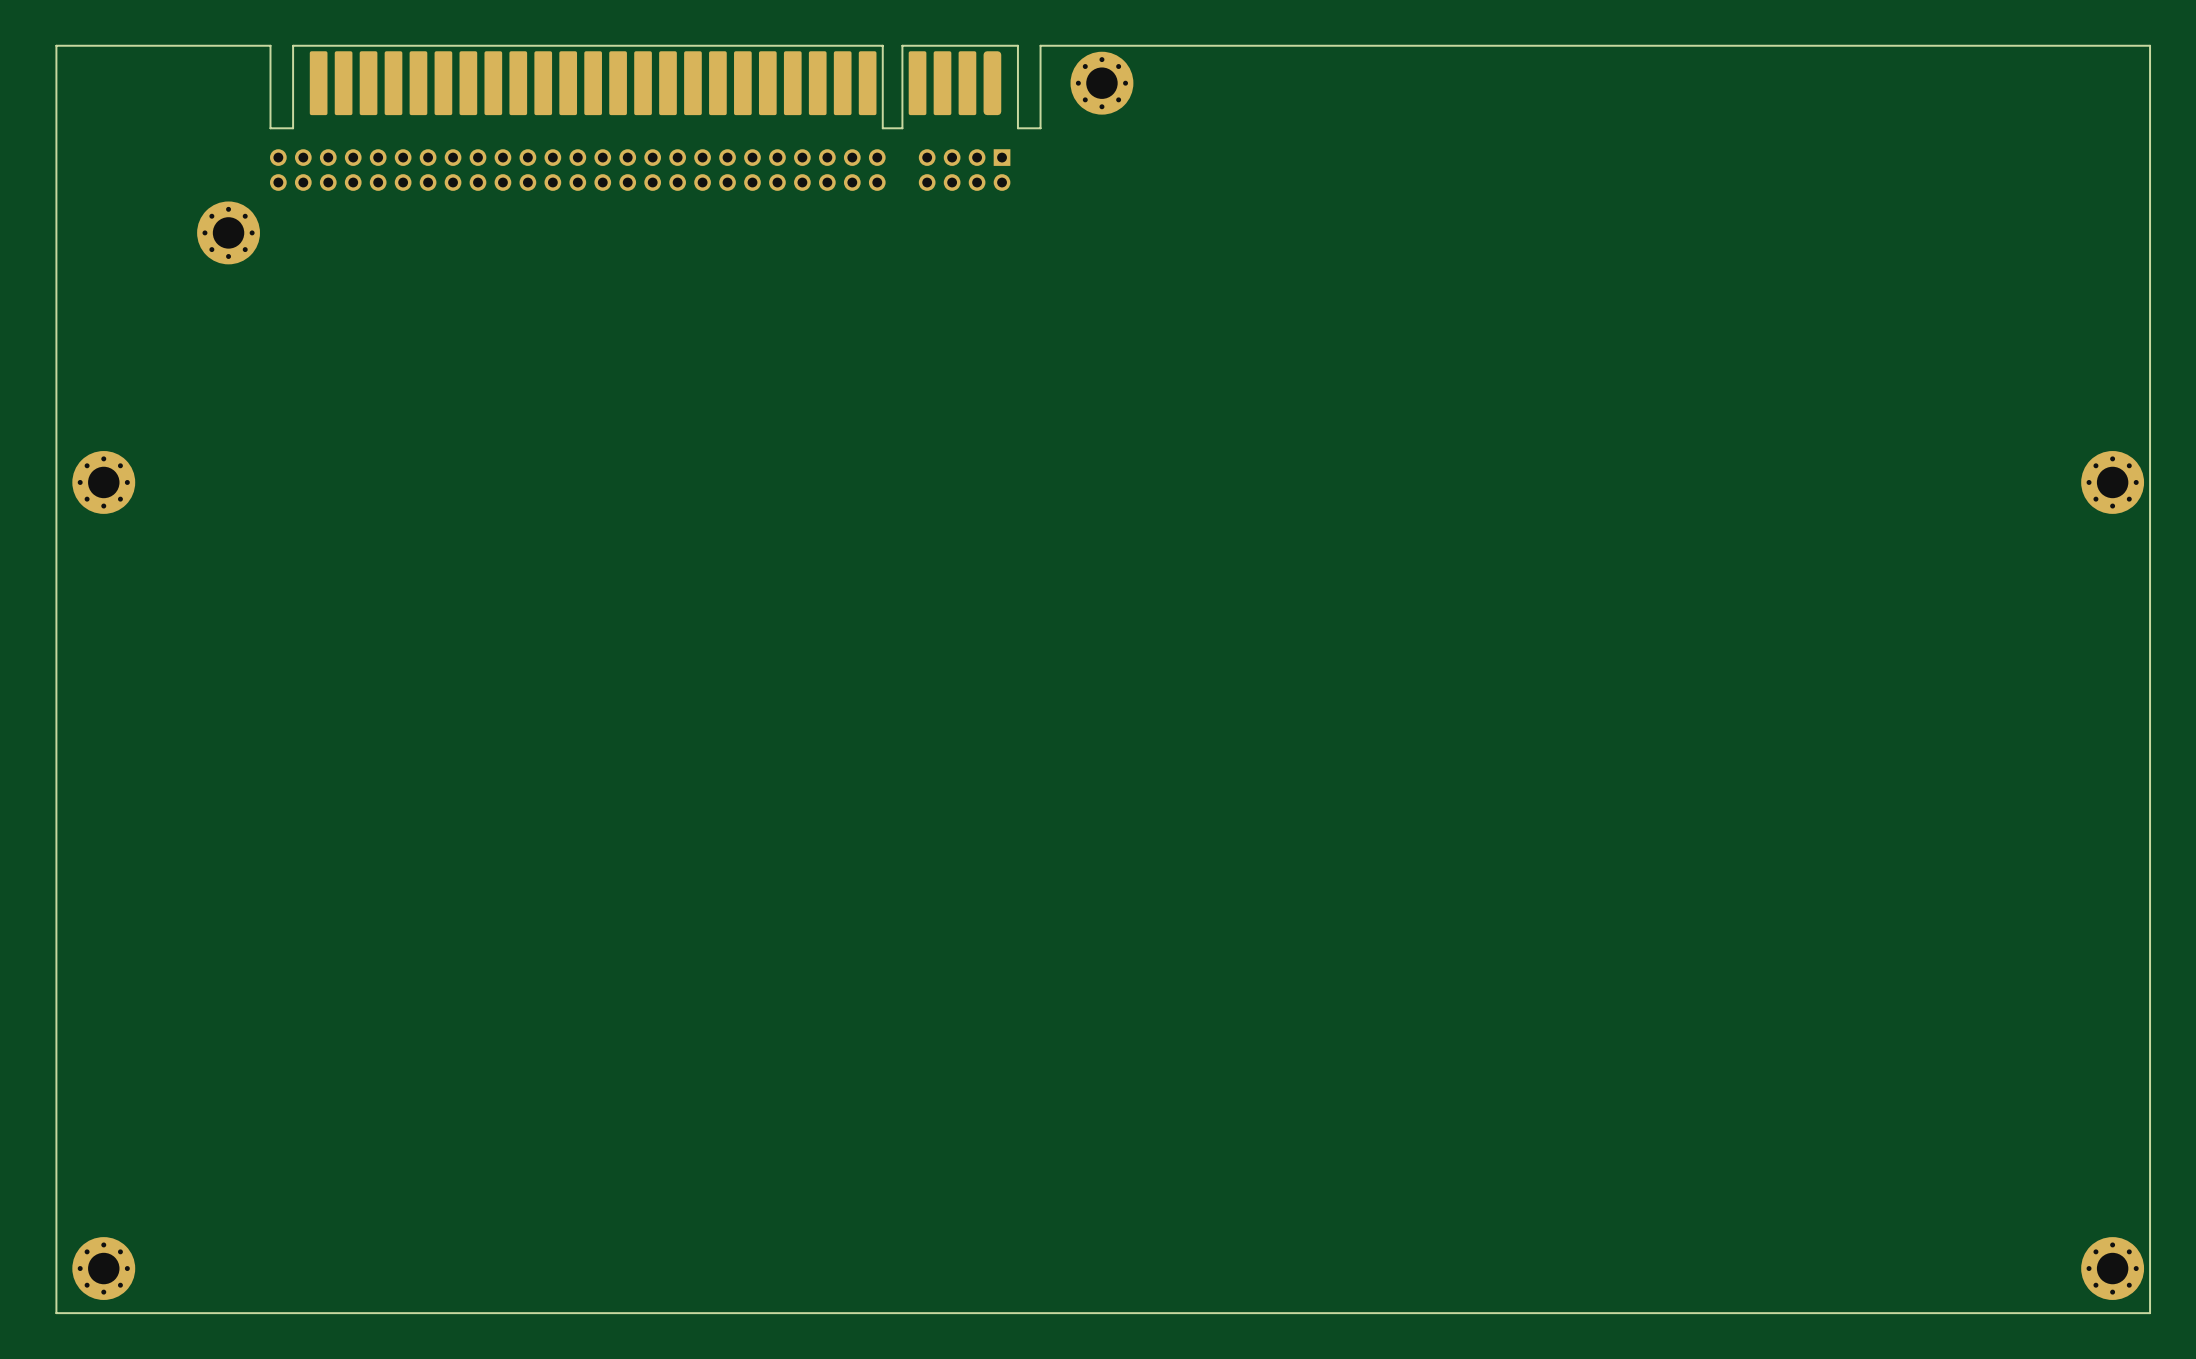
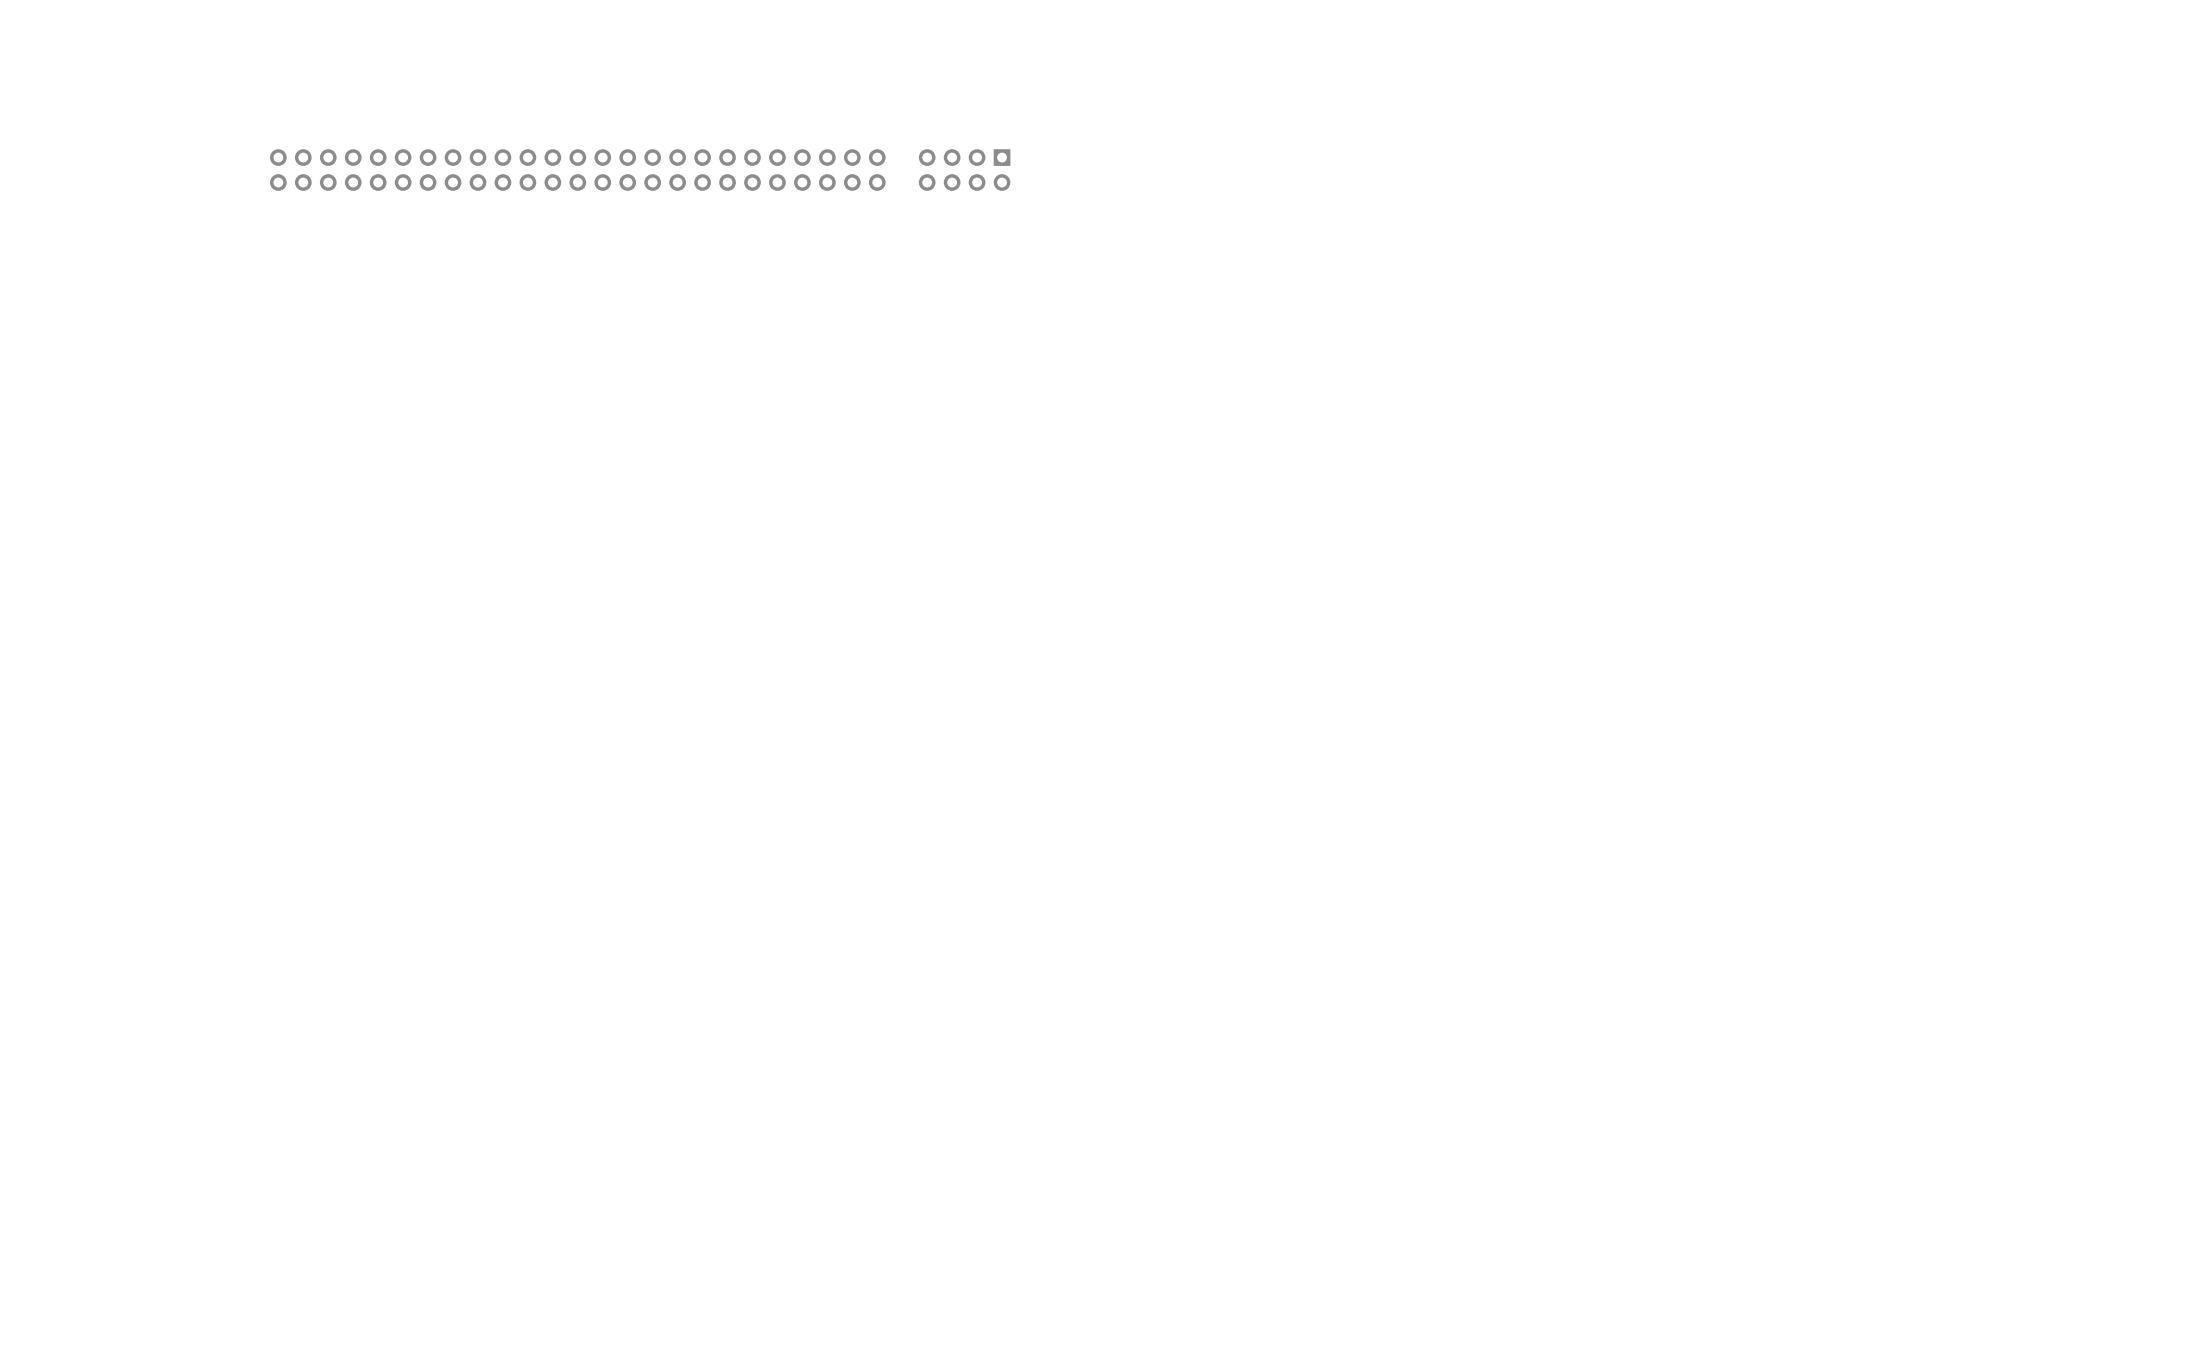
board edge: (1040, 45) (2150, 45) (2150, 1313) (56, 1313) (56, 45) (270, 45) -> none
part: (1101, 83) -> none
part: (655, 87) -> none
part: (228, 232) -> none
part: (103, 482) -> none
part: (2112, 482) -> none
part: (103, 1268) -> none
part: (2112, 1268) -> none

